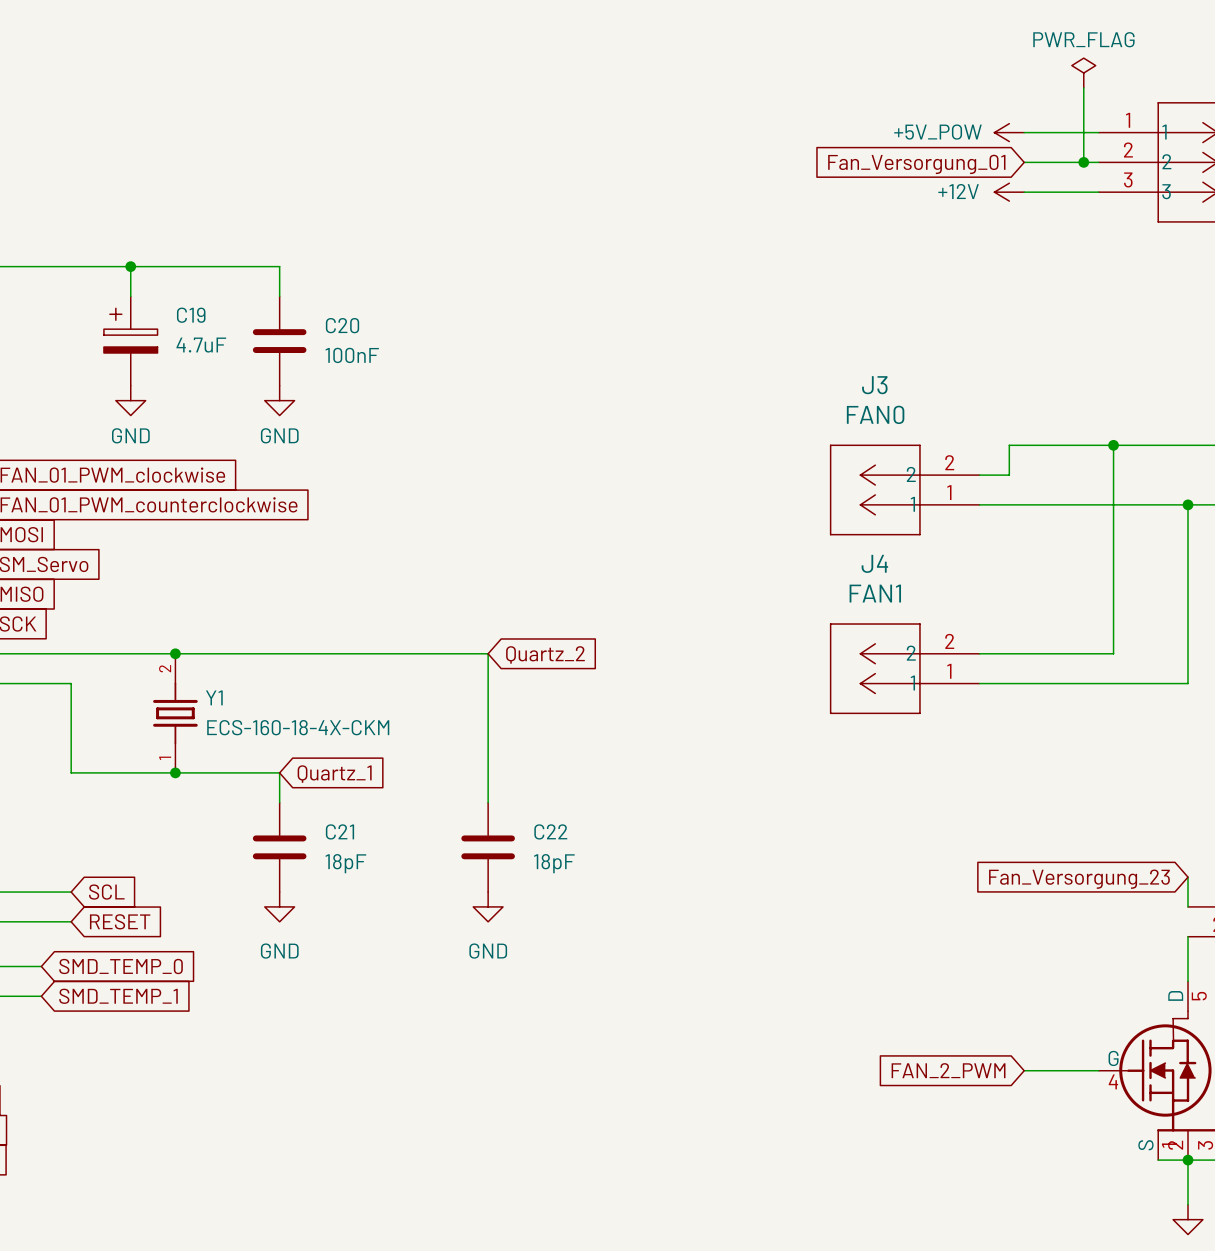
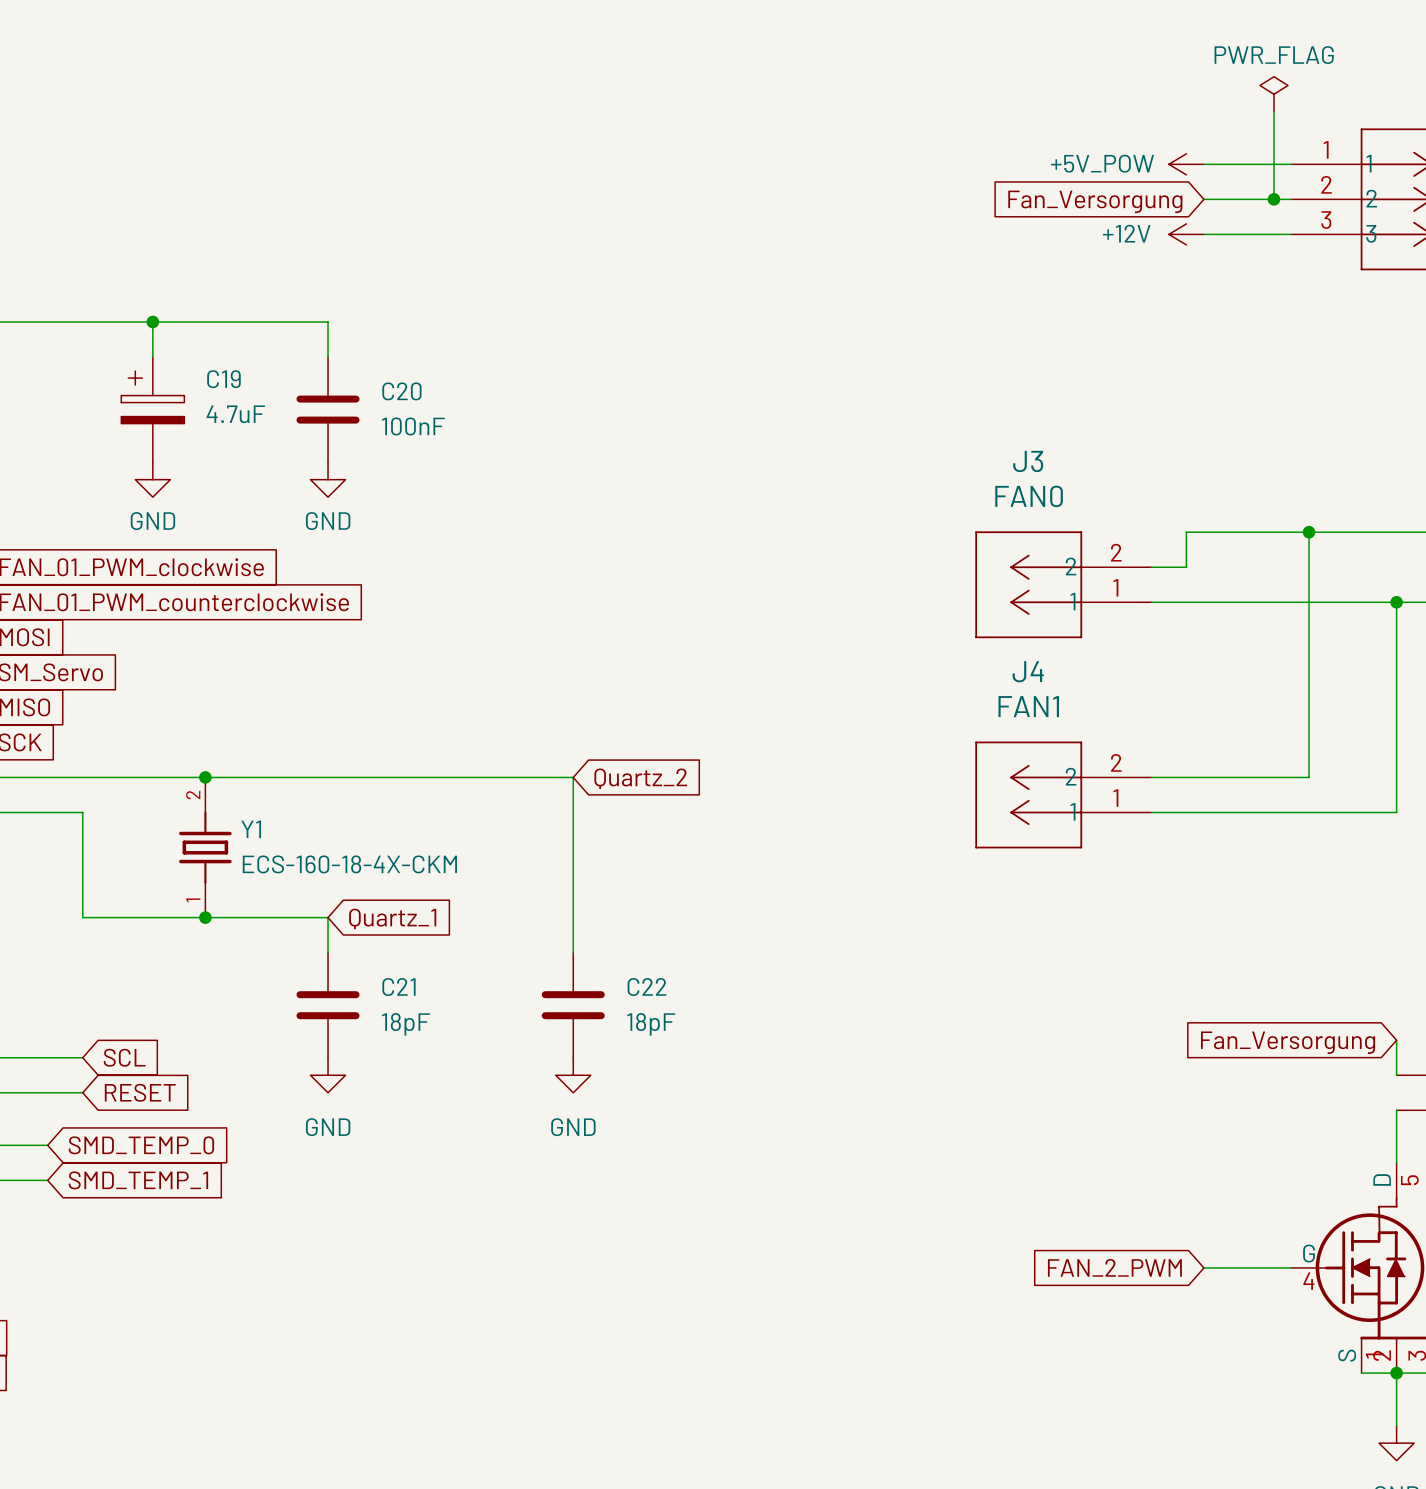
global label: Fan_Versorgung_01 (916, 164) -> Fan_Versorgung (1095, 201)
global label: Fan_Versorgung_23 (1079, 879) -> Fan_Versorgung (1288, 1042)

